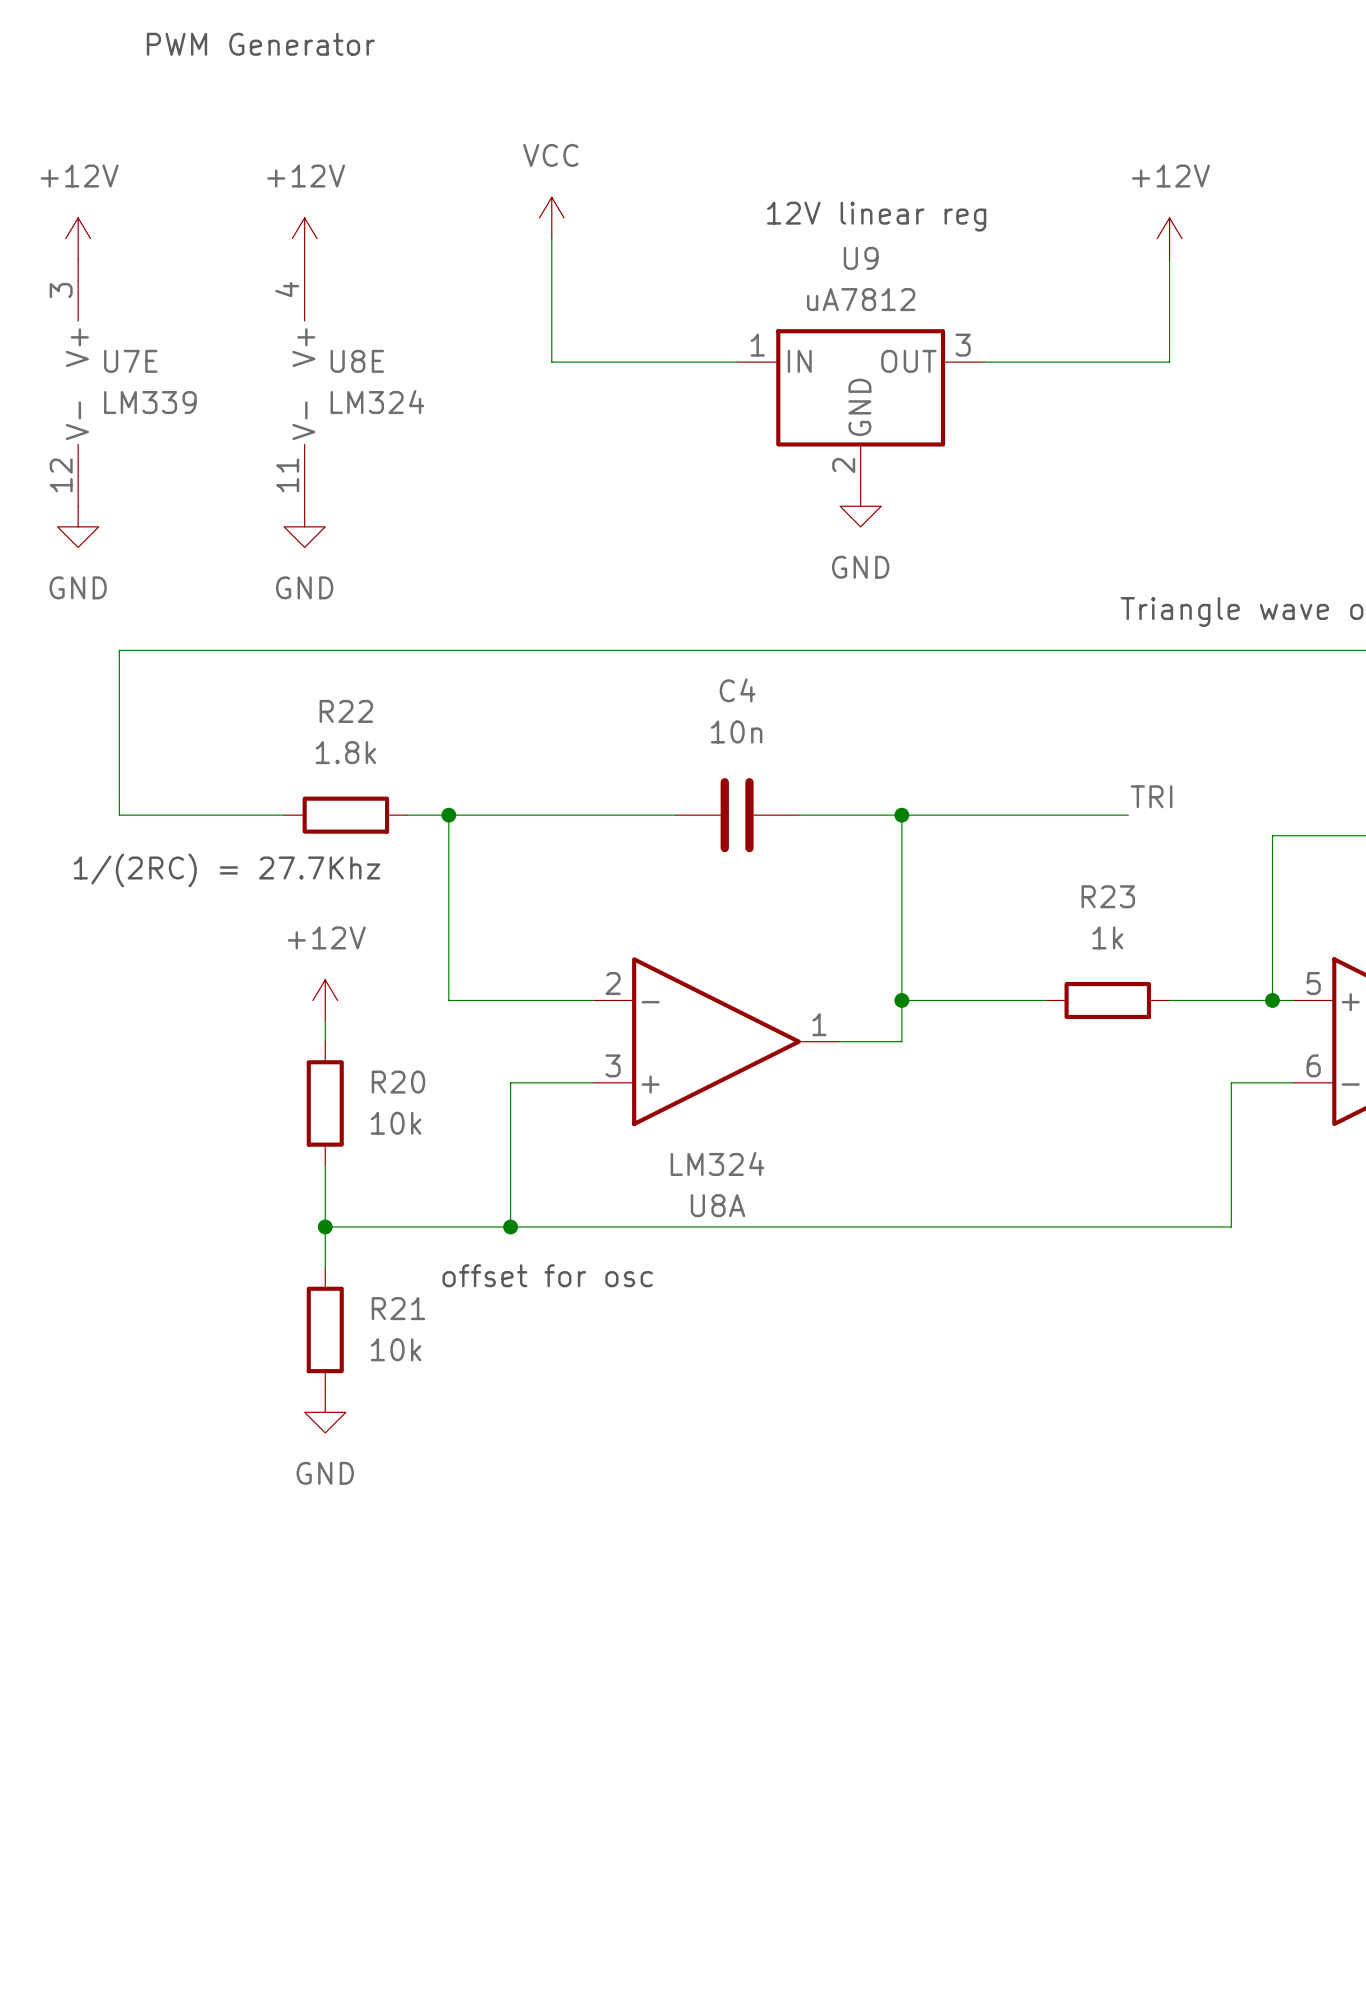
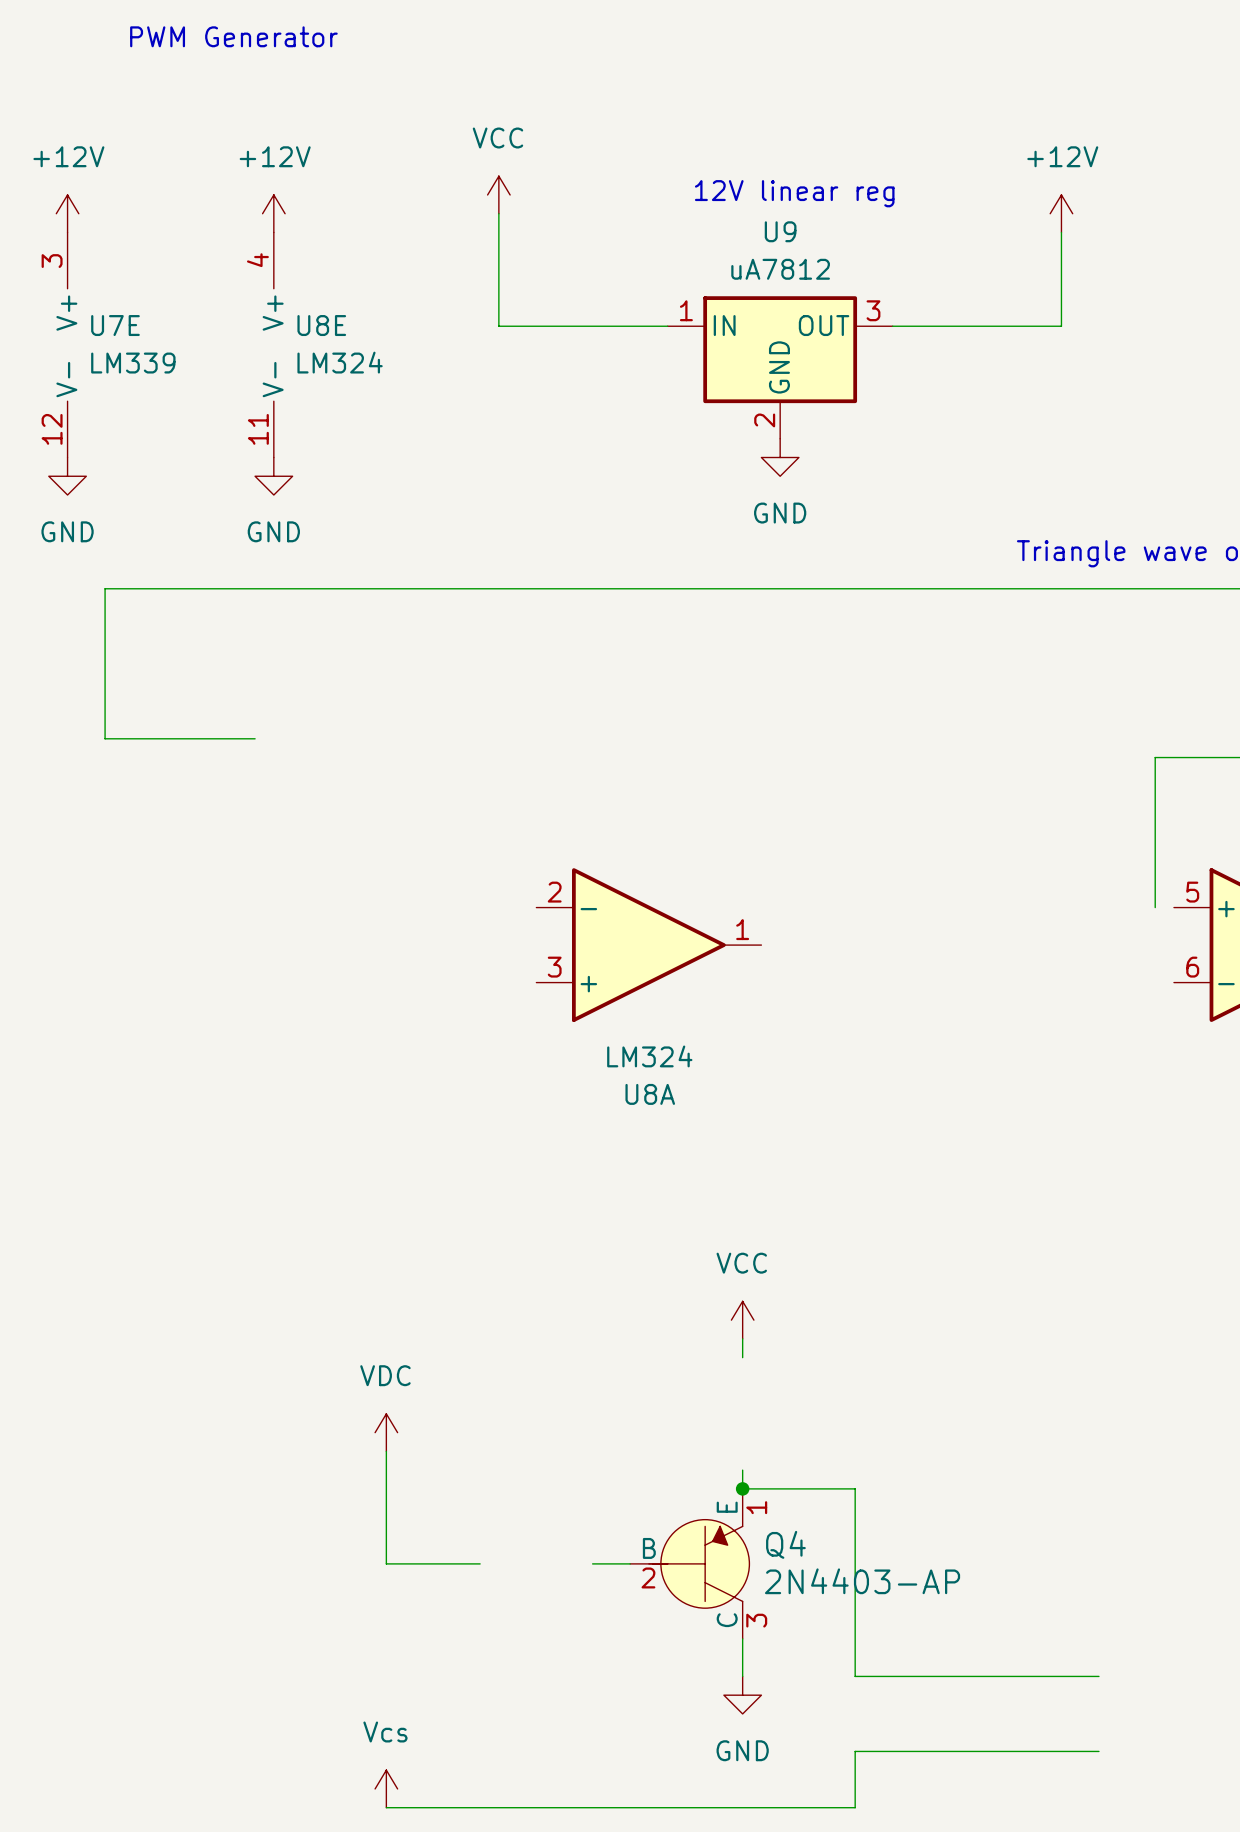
label: TRI (1151, 796) -> none
R22: 1.8k (345, 815) -> none
wire: (407, 815) (675, 815) -> none
wire: (448, 815) (448, 1000) (592, 1000) -> none
junction: (448, 815) -> none
C4: 10n (737, 815) -> none
wire: (798, 815) (1128, 815) -> none
wire: (901, 815) (901, 1041) (840, 1041) -> none
junction: (901, 815) -> none
text: 1/(2RC) = 27.7Khz (226, 870) -> none
power symbol: +12V (325, 1000) -> none
wire: (901, 1000) (1046, 1000) -> none
junction: (901, 1000) -> none
R23: 1k (1107, 1000) -> none
wire: (1169, 1000) (1293, 1000) -> none
junction: (1272, 1000) -> none
wire: (325, 1021) (325, 1041) -> none
wire: (592, 1082) (510, 1082) (510, 1227) -> none
wire: (1293, 1082) (1231, 1082) (1231, 1227) (325, 1227) -> none
R20: 10k (325, 1103) -> none
wire: (325, 1165) (325, 1268) -> none
junction: (325, 1227) -> none
junction: (510, 1227) -> none
text: offset for osc (547, 1275) -> none
R21: 10k (325, 1329) -> none
power symbol: GND (325, 1412) -> none
power symbol: none -> VCC (742, 1320)
wire: none -> (742, 1338) (742, 1357)
power symbol: none -> VDC (386, 1432)
wire: none -> (386, 1451) (386, 1563) (480, 1563)
wire: none -> (742, 1470) (742, 1488) (855, 1488) (855, 1676) (1098, 1676)
junction: none -> (742, 1488)
wire: none -> (592, 1563) (630, 1563)
Q4: none -> 2N4403-AP (689, 1563)
wire: none -> (742, 1638) (742, 1676)
power symbol: none -> GND (742, 1695)
wire: none -> (1098, 1751) (855, 1751) (855, 1807) (386, 1807)
power symbol: none -> Vcs (386, 1788)

